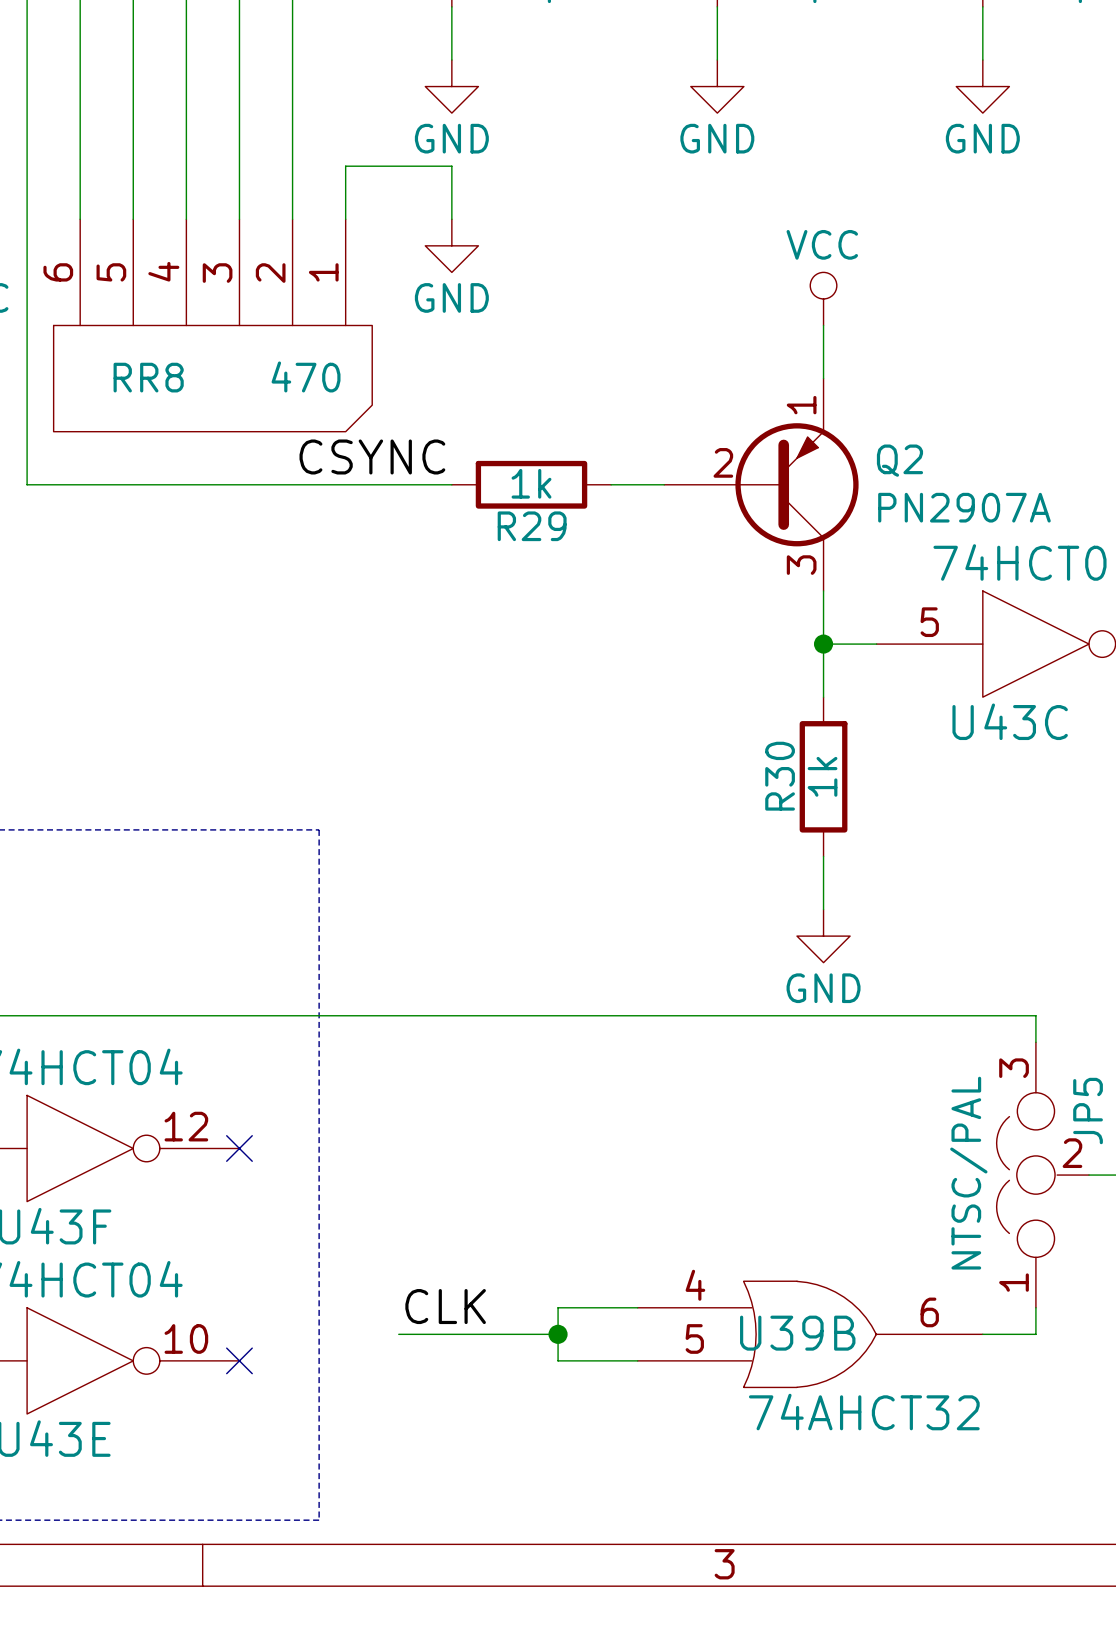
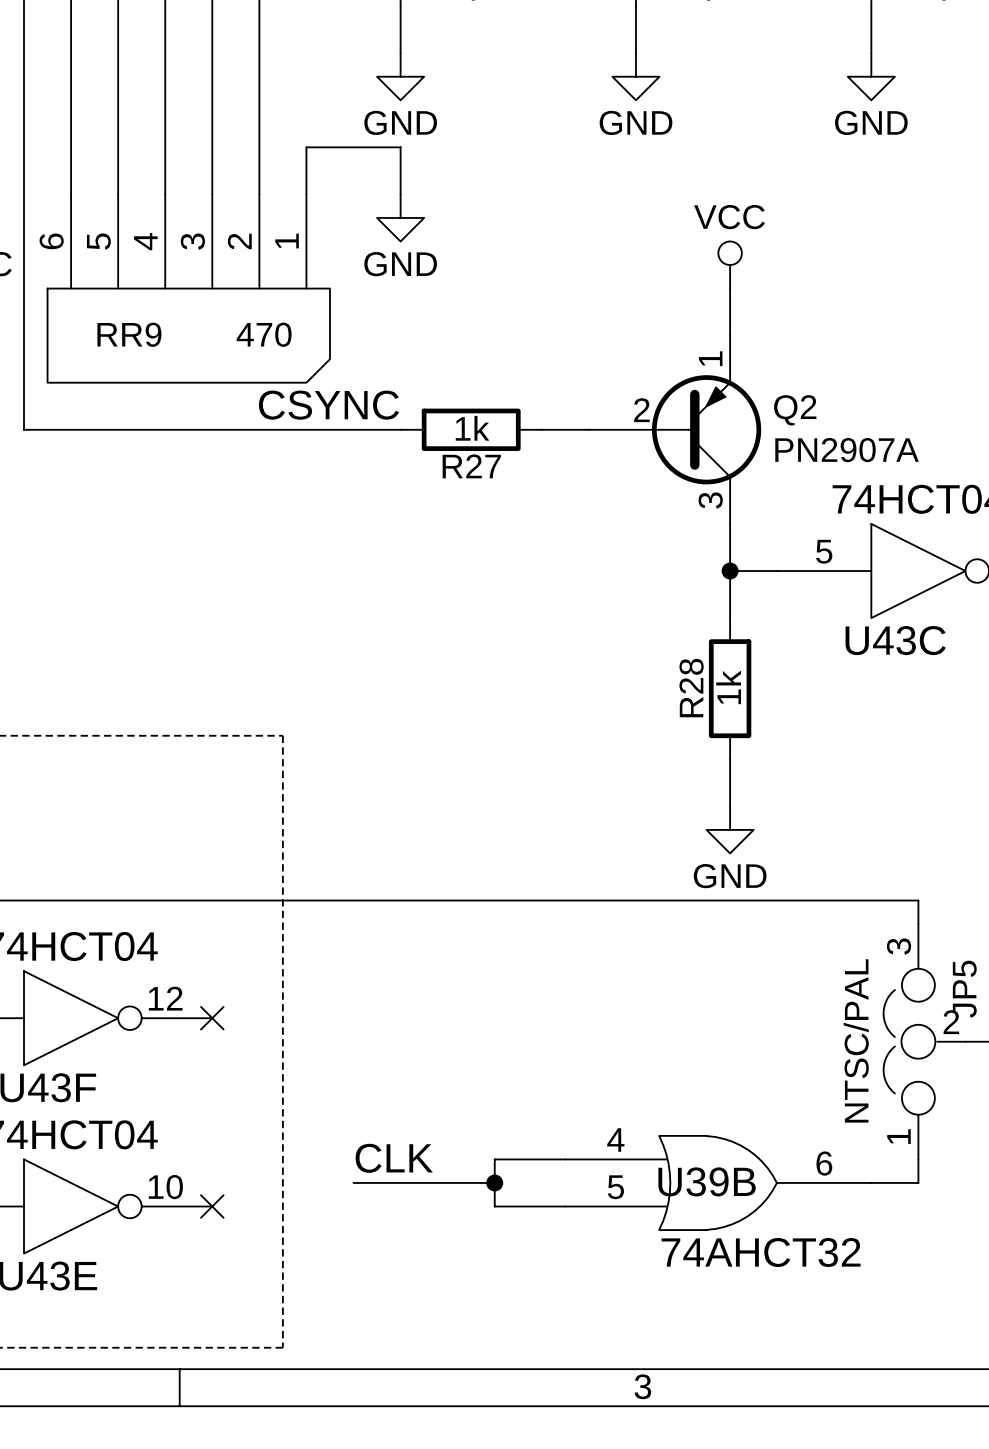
RR8 name: RR8 (148, 377) -> RR9 (129, 334)
R29 name: R29 (532, 526) -> R27 (471, 466)
R30 name: R30 (780, 776) -> R28 (691, 688)

